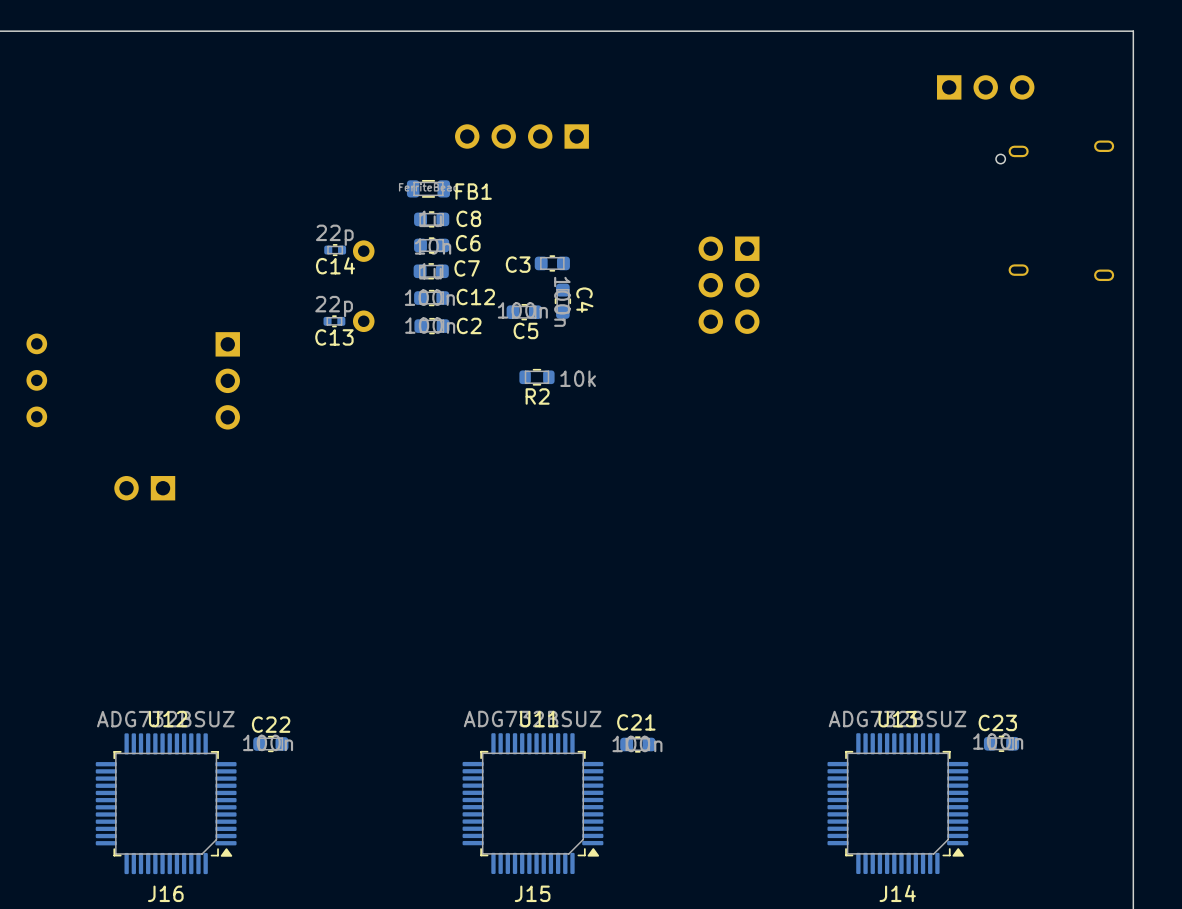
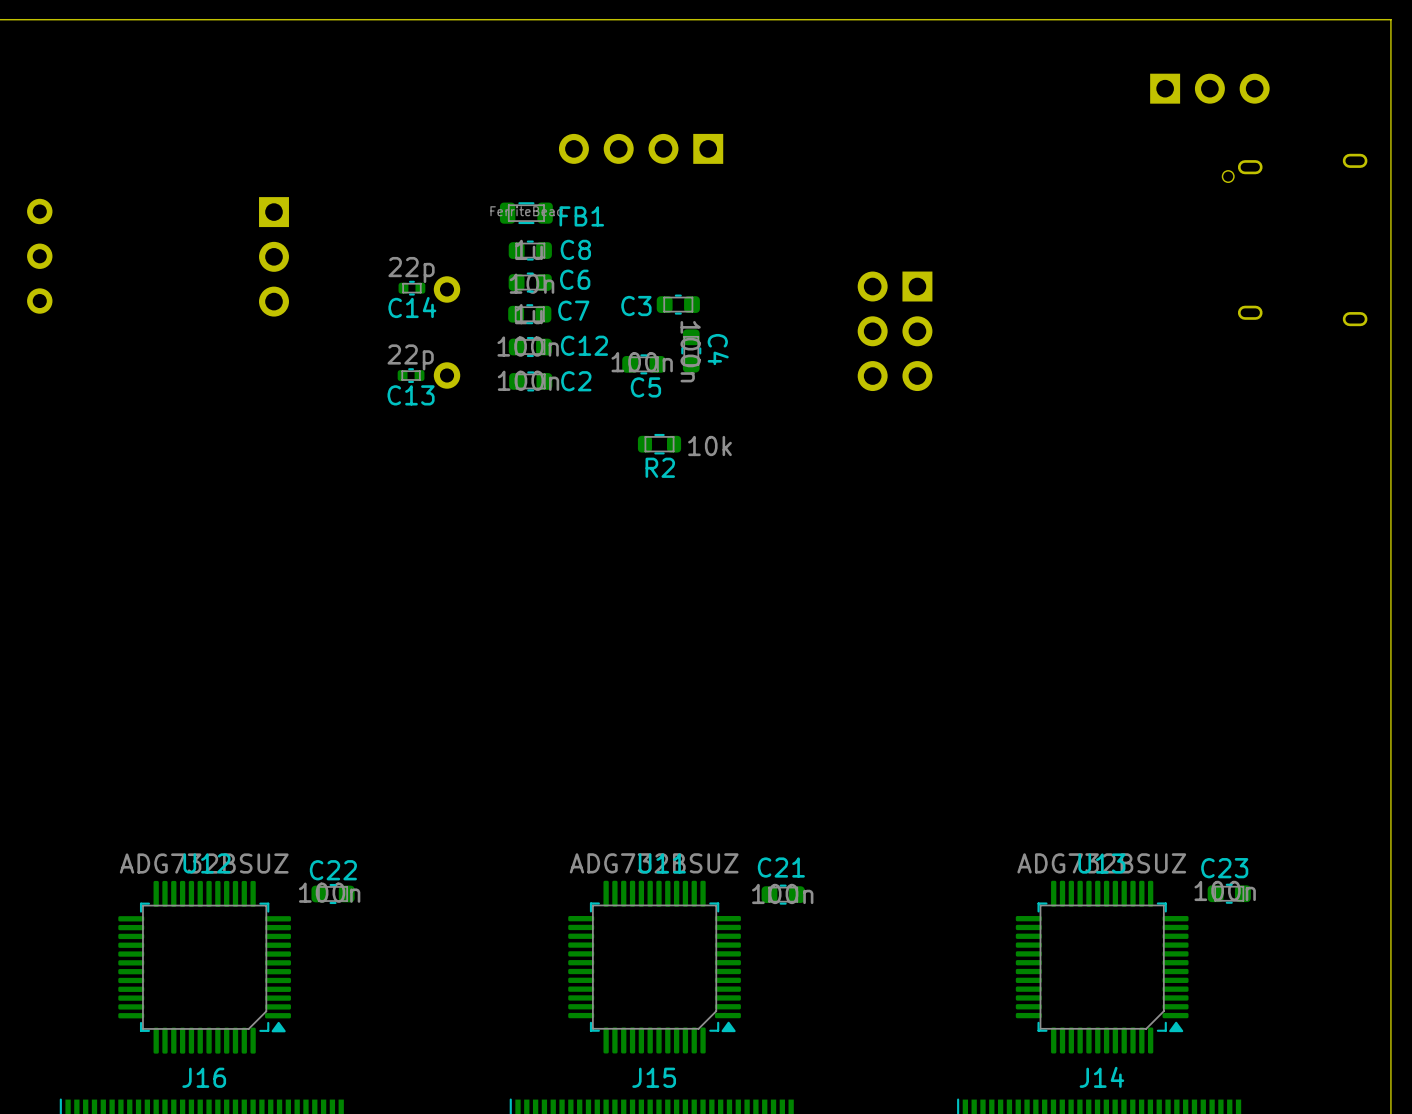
part position: (36, 380) -> (39, 256)
part position: (227, 380) -> (274, 256)
part: (144, 488) -> none

